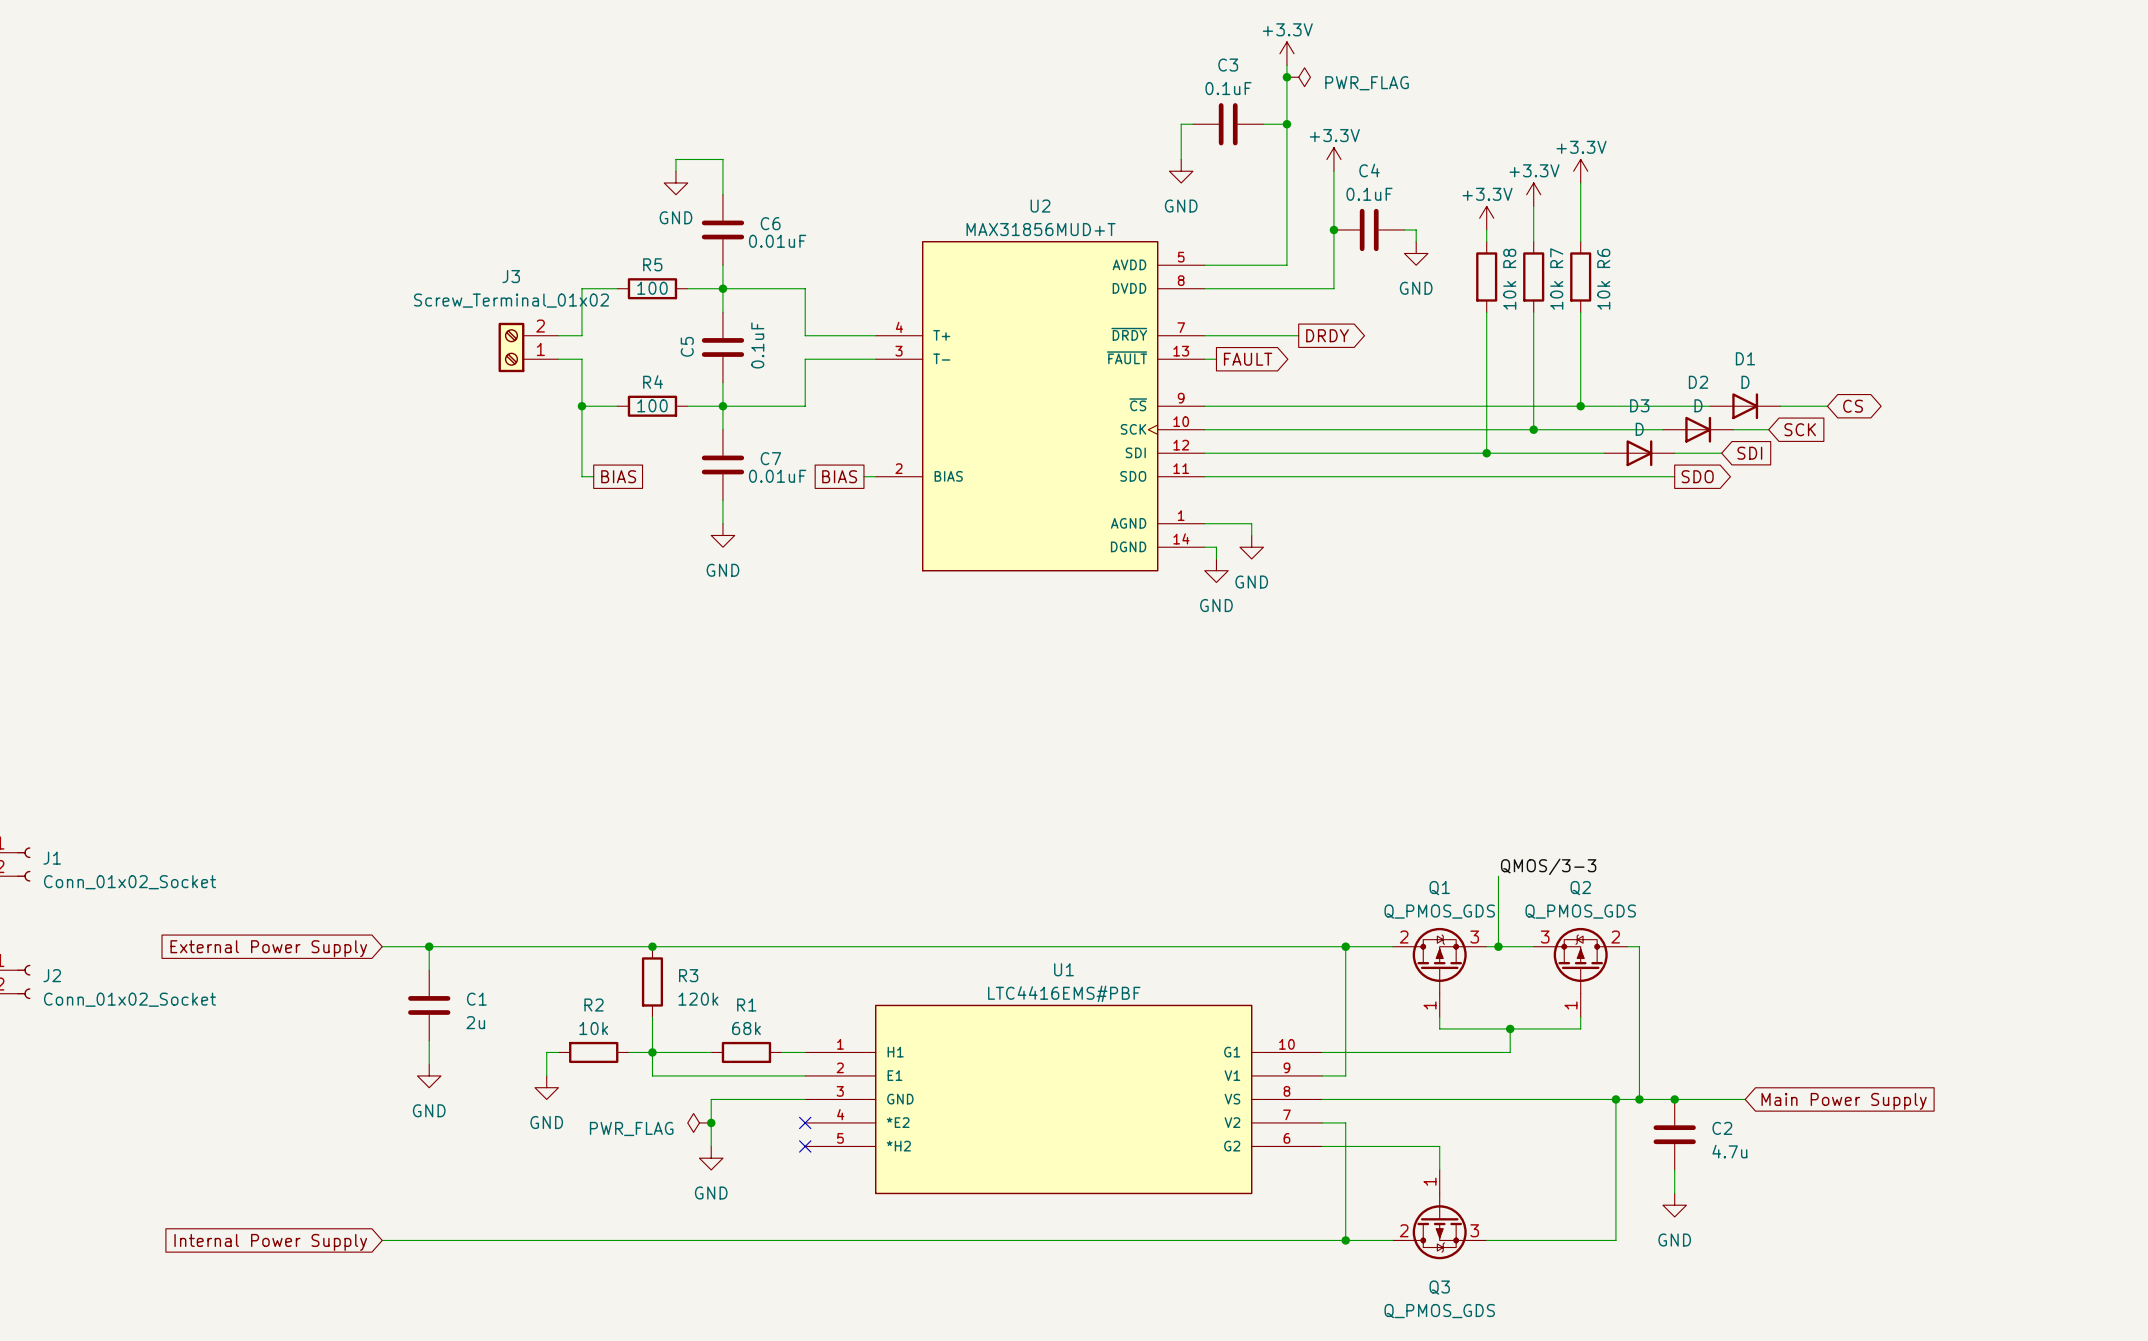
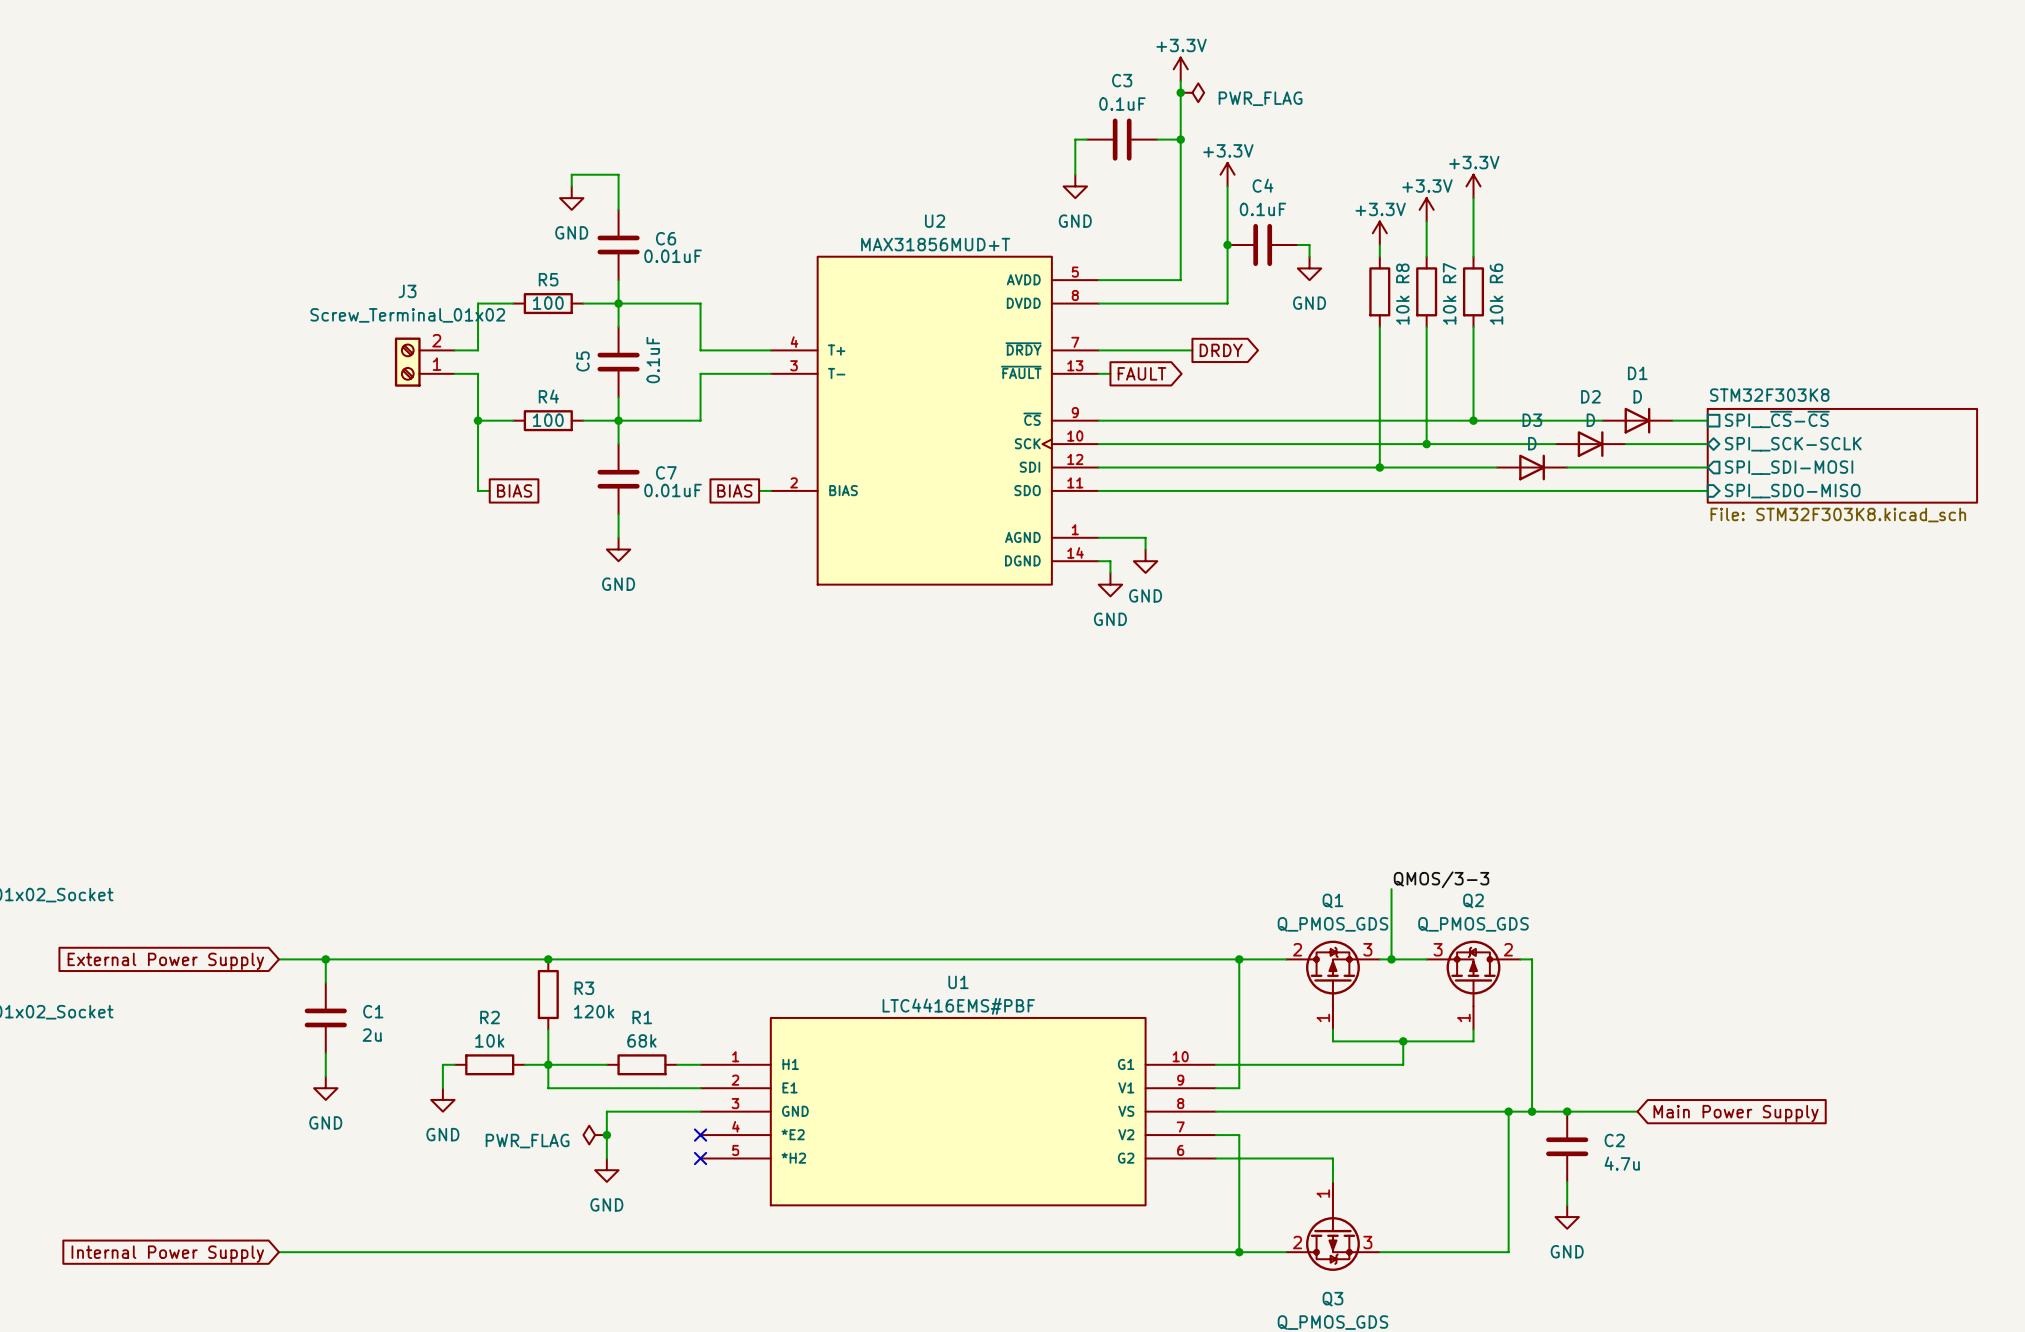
sheet pin: none -> SPI__~{CS}-~{CS} (1777, 419)
wire: (1815, 406) (1827, 406) -> none
global label: CS (1853, 406) -> none
wire: none -> (1660, 444) (1707, 444)
global label: SCK (1800, 429) -> none
sheet pin: none -> SPI__SCK-SCLK (1793, 444)
sheet STM32F303K8: none -> File: STM32F303K8.kicad_sch (1842, 455)
wire: none -> (1614, 467) (1707, 467)
global label: SDI (1749, 453) -> none
sheet pin: none -> SPI__SDI-MOSI (1789, 467)
wire: none -> (1567, 490) (1707, 490)
global label: SDO (1697, 476) -> none
sheet pin: none -> SPI__SDO-MISO (1792, 491)

